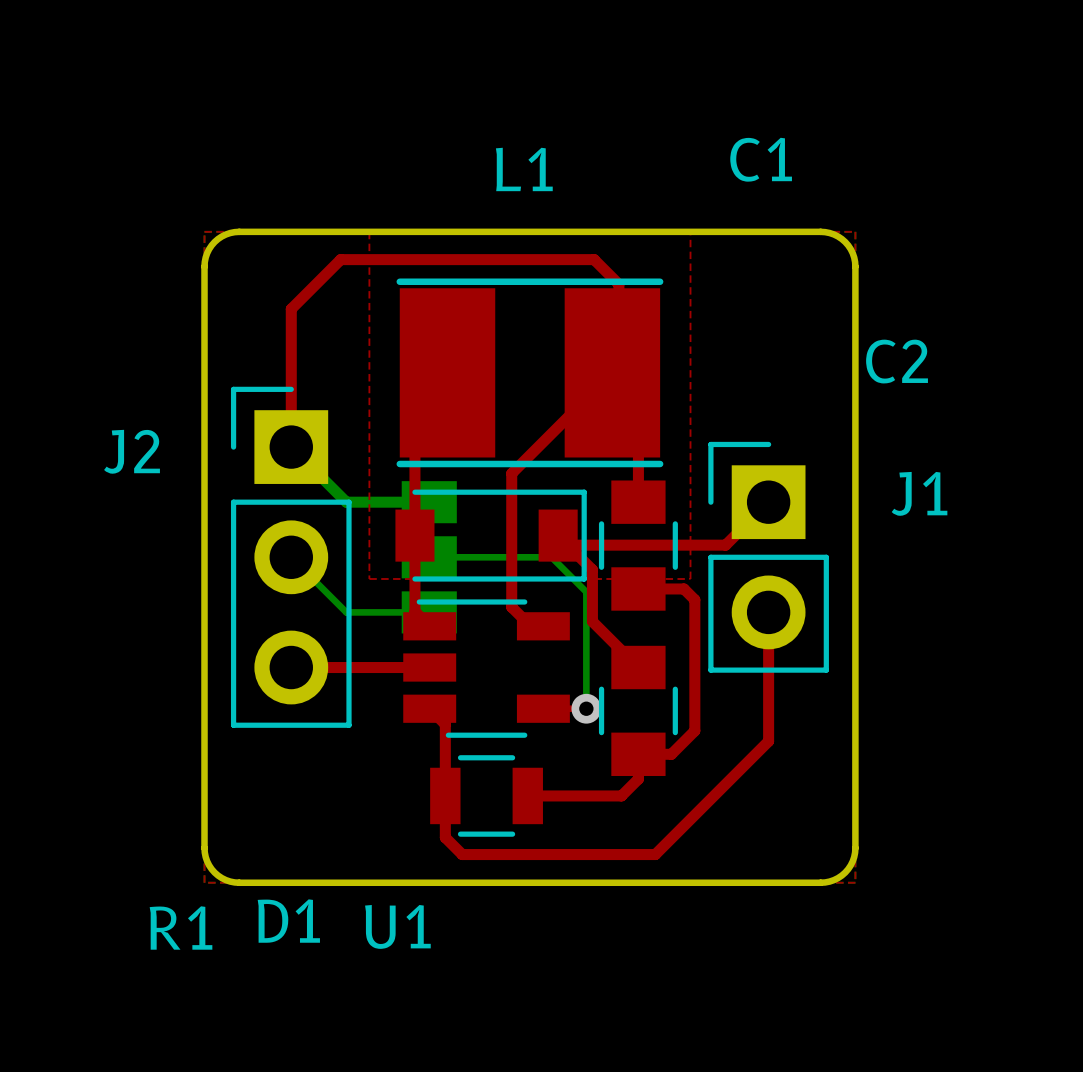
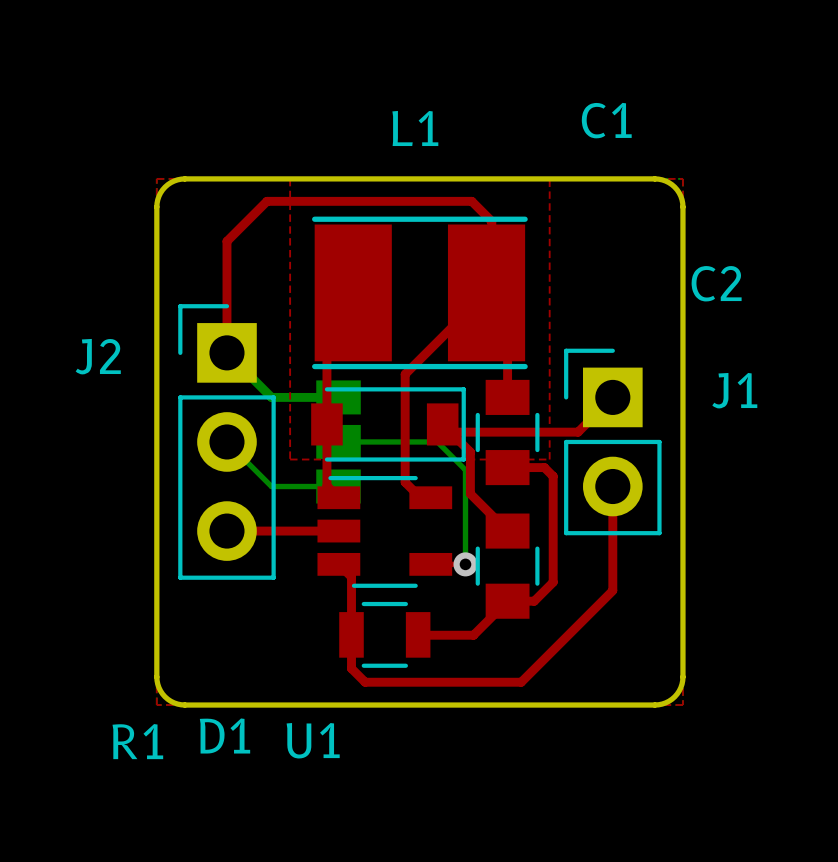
top track: (638, 754) (638, 779) (621, 795) (527, 795) -> (507, 601) (473, 635) (419, 635)

